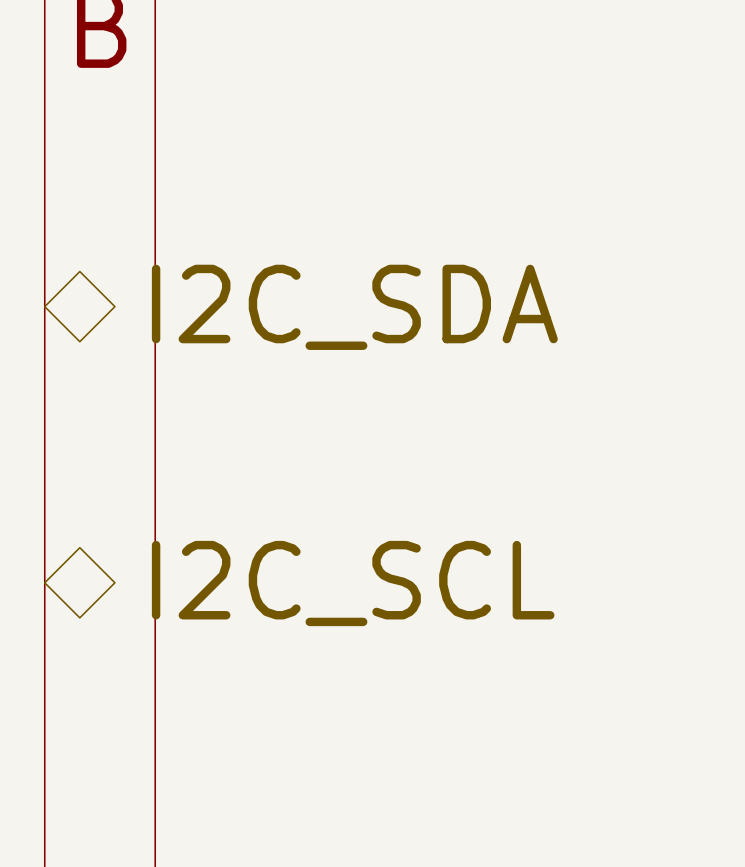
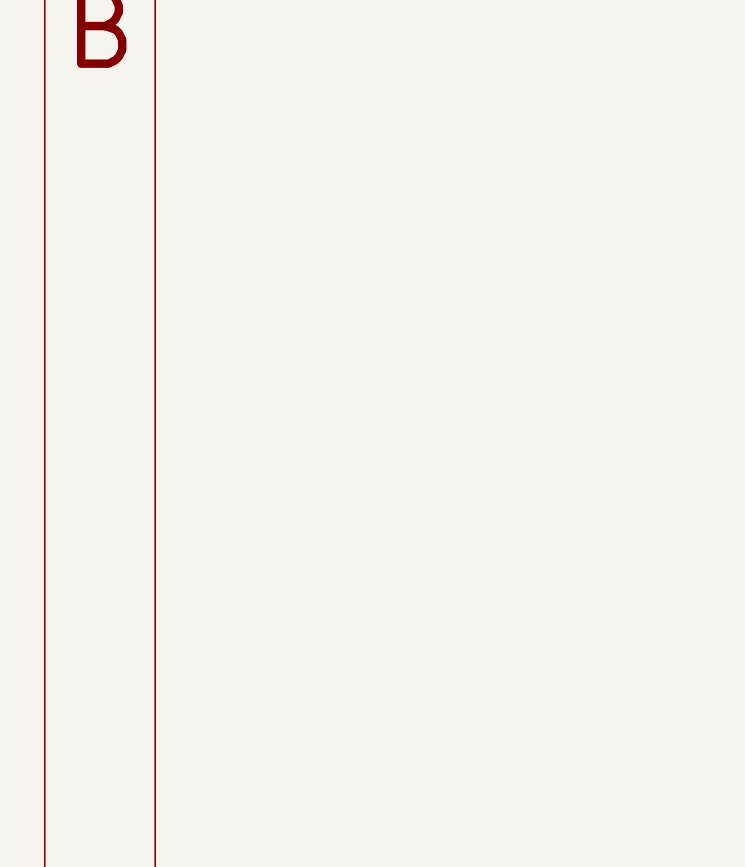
hierarchical label: I2C_SDA (354, 307) -> none
hierarchical label: I2C_SCL (353, 583) -> none

